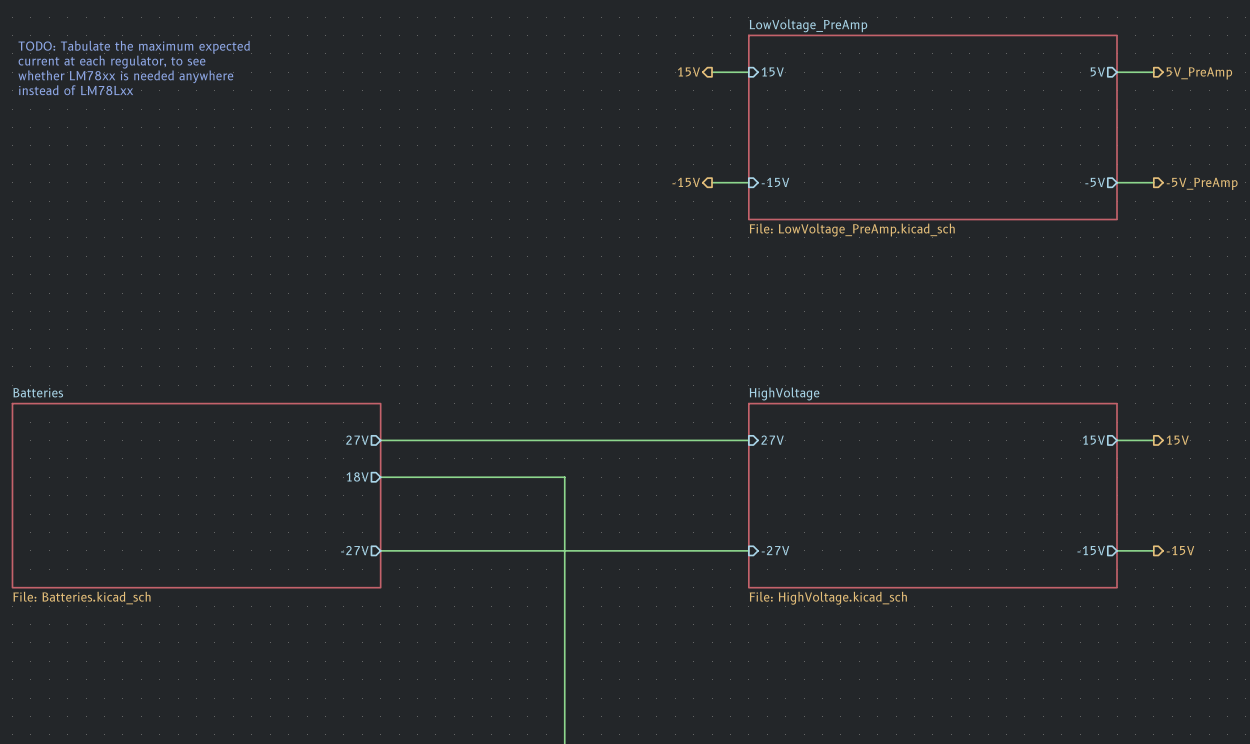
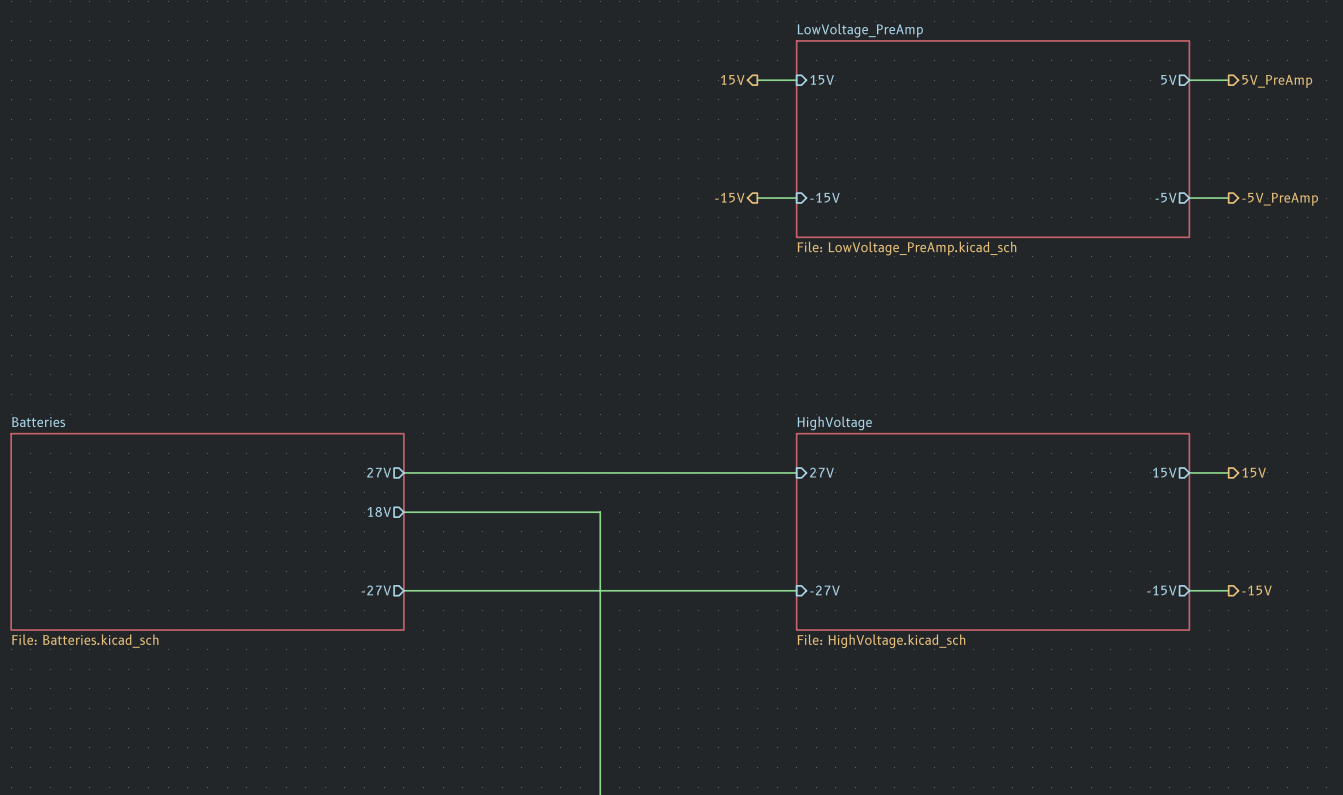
text: TODO: Tabulate the maximum expected (134, 47) -> none
text: current at each regulator, to see (111, 62) -> none
text: whether LM78xx is needed anywhere (125, 76) -> none
text: instead of LM78Lxx (76, 90) -> none

